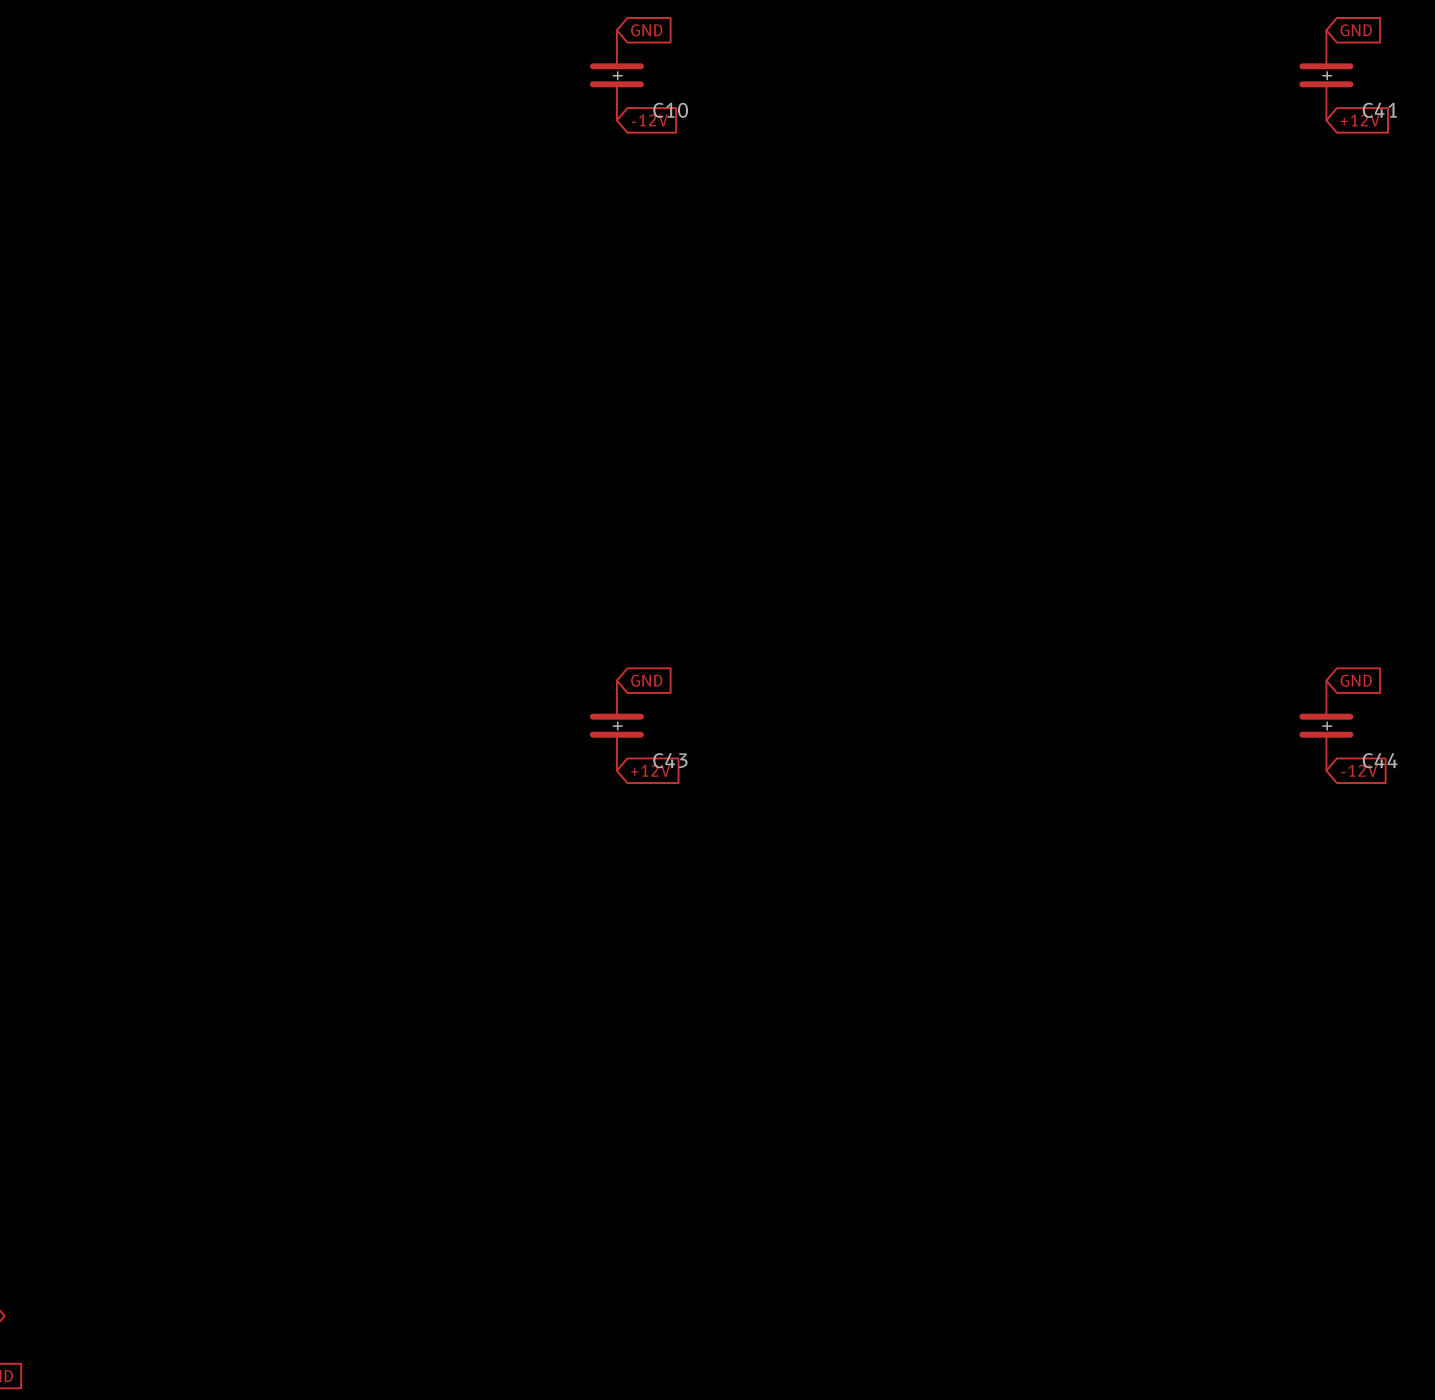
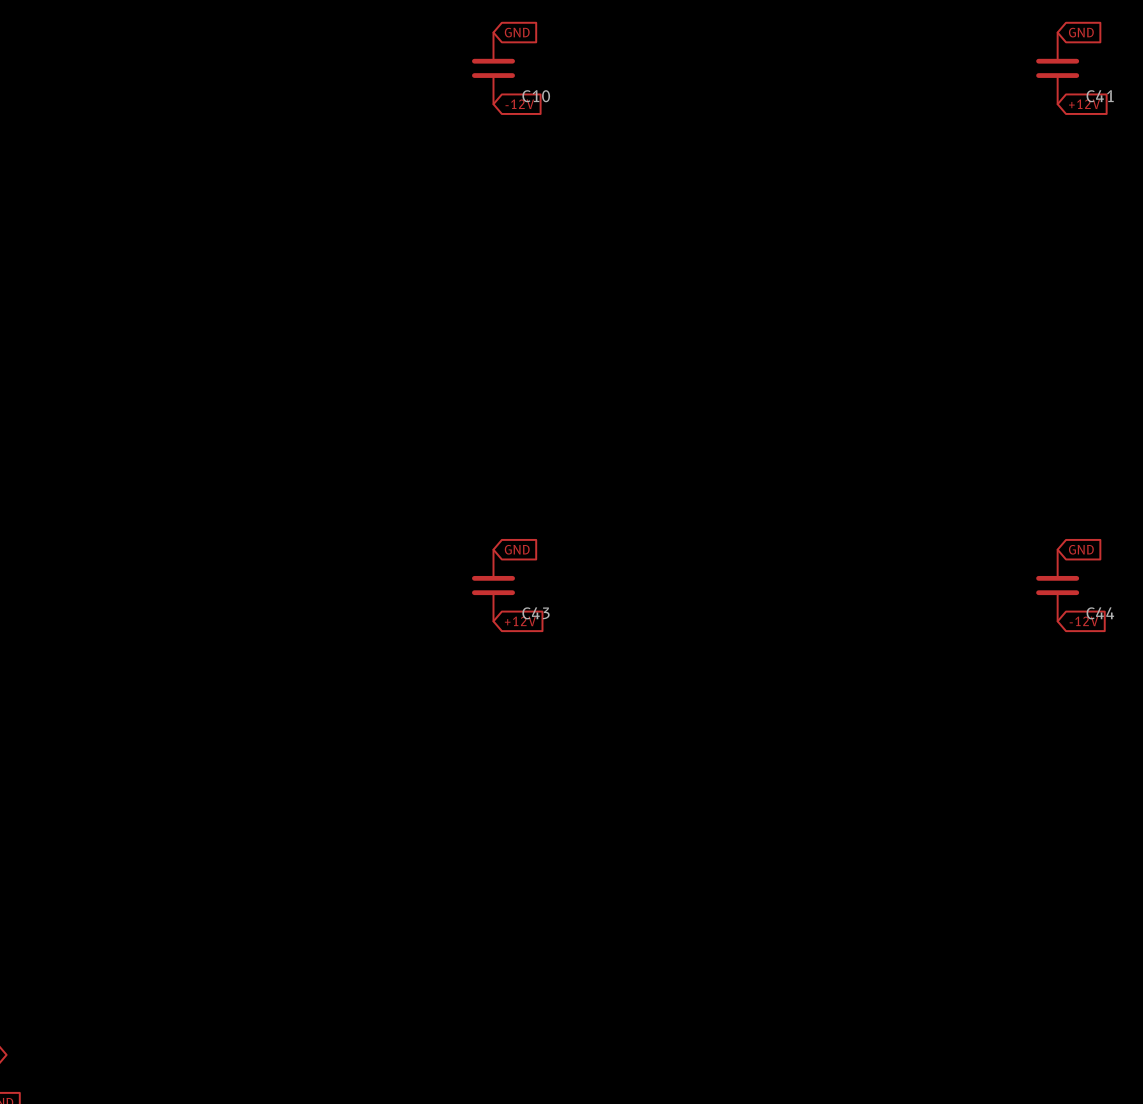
C10 pin name: + (617, 75) -> none
C41 pin name: + (1327, 75) -> none
C43 pin name: + (617, 726) -> none
C44 pin name: + (1327, 726) -> none

